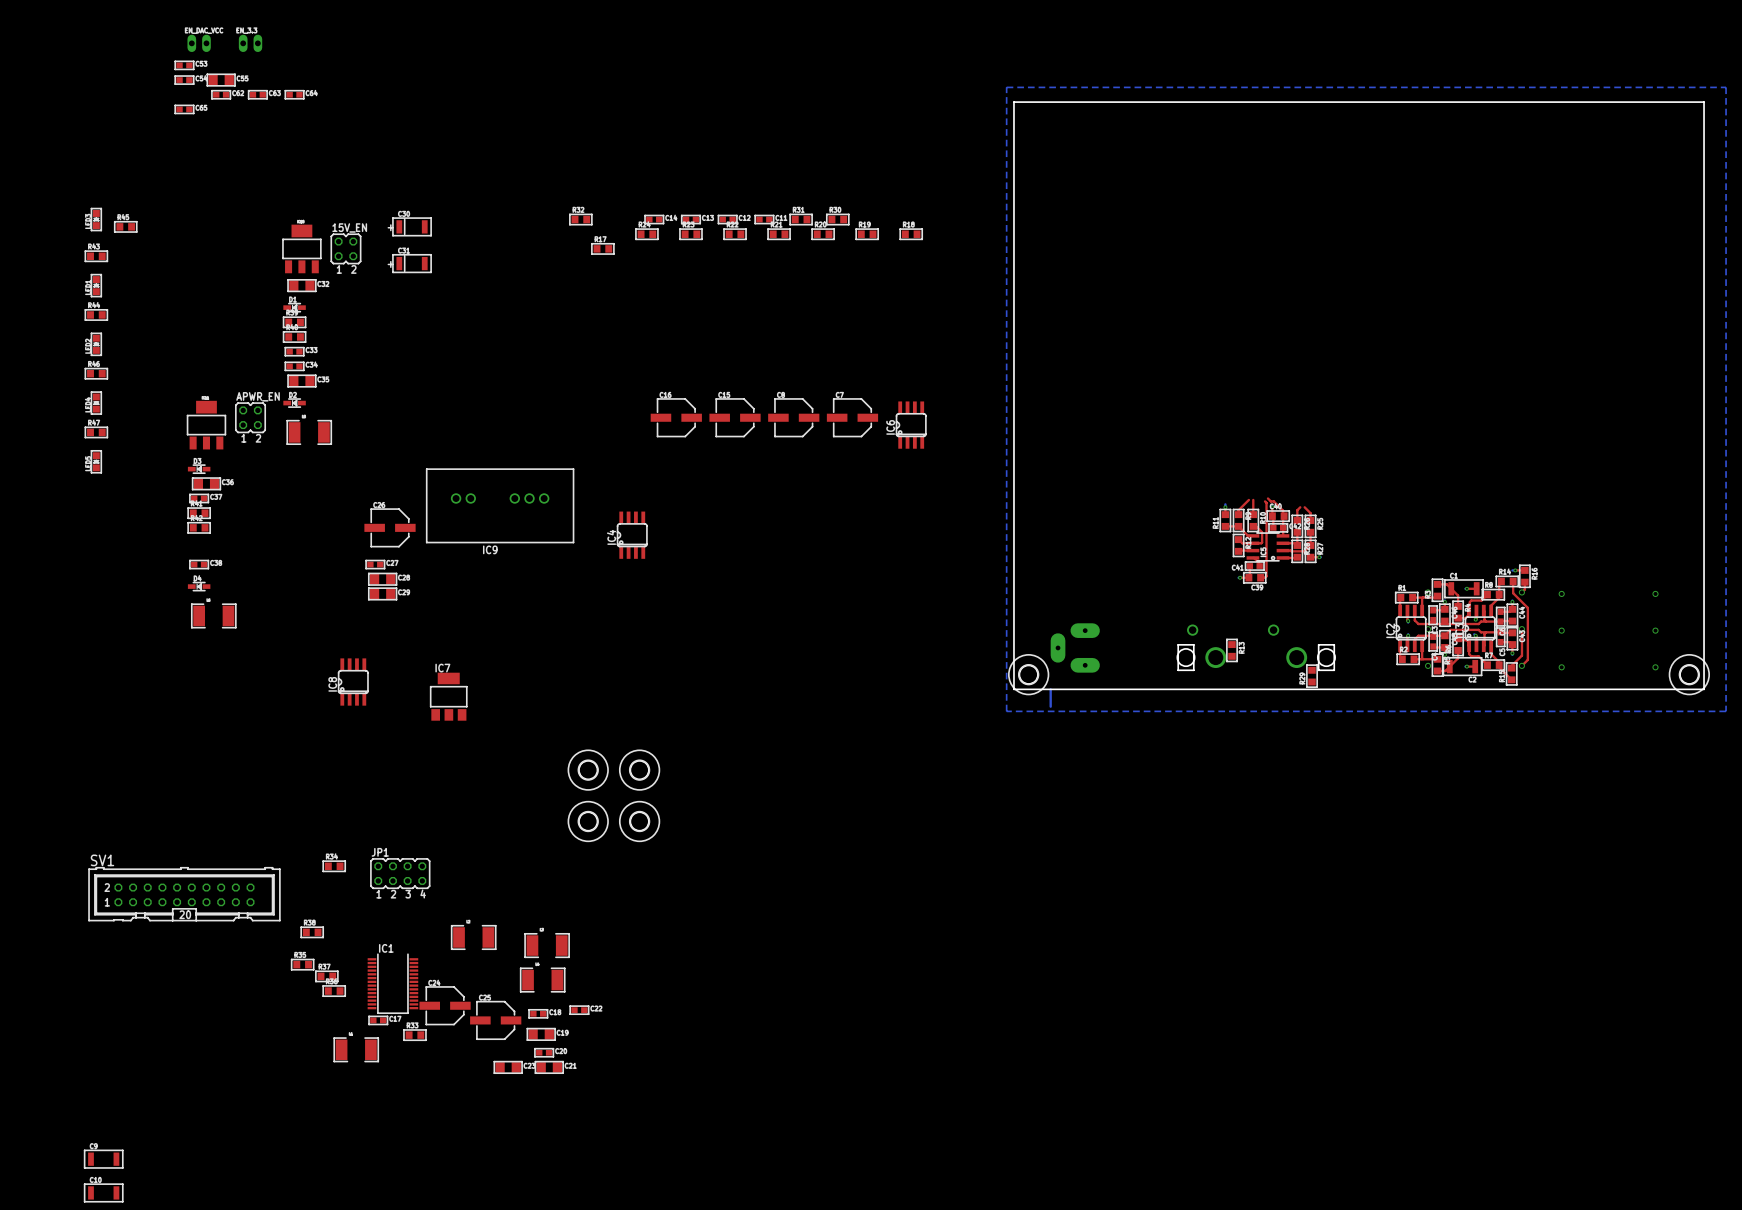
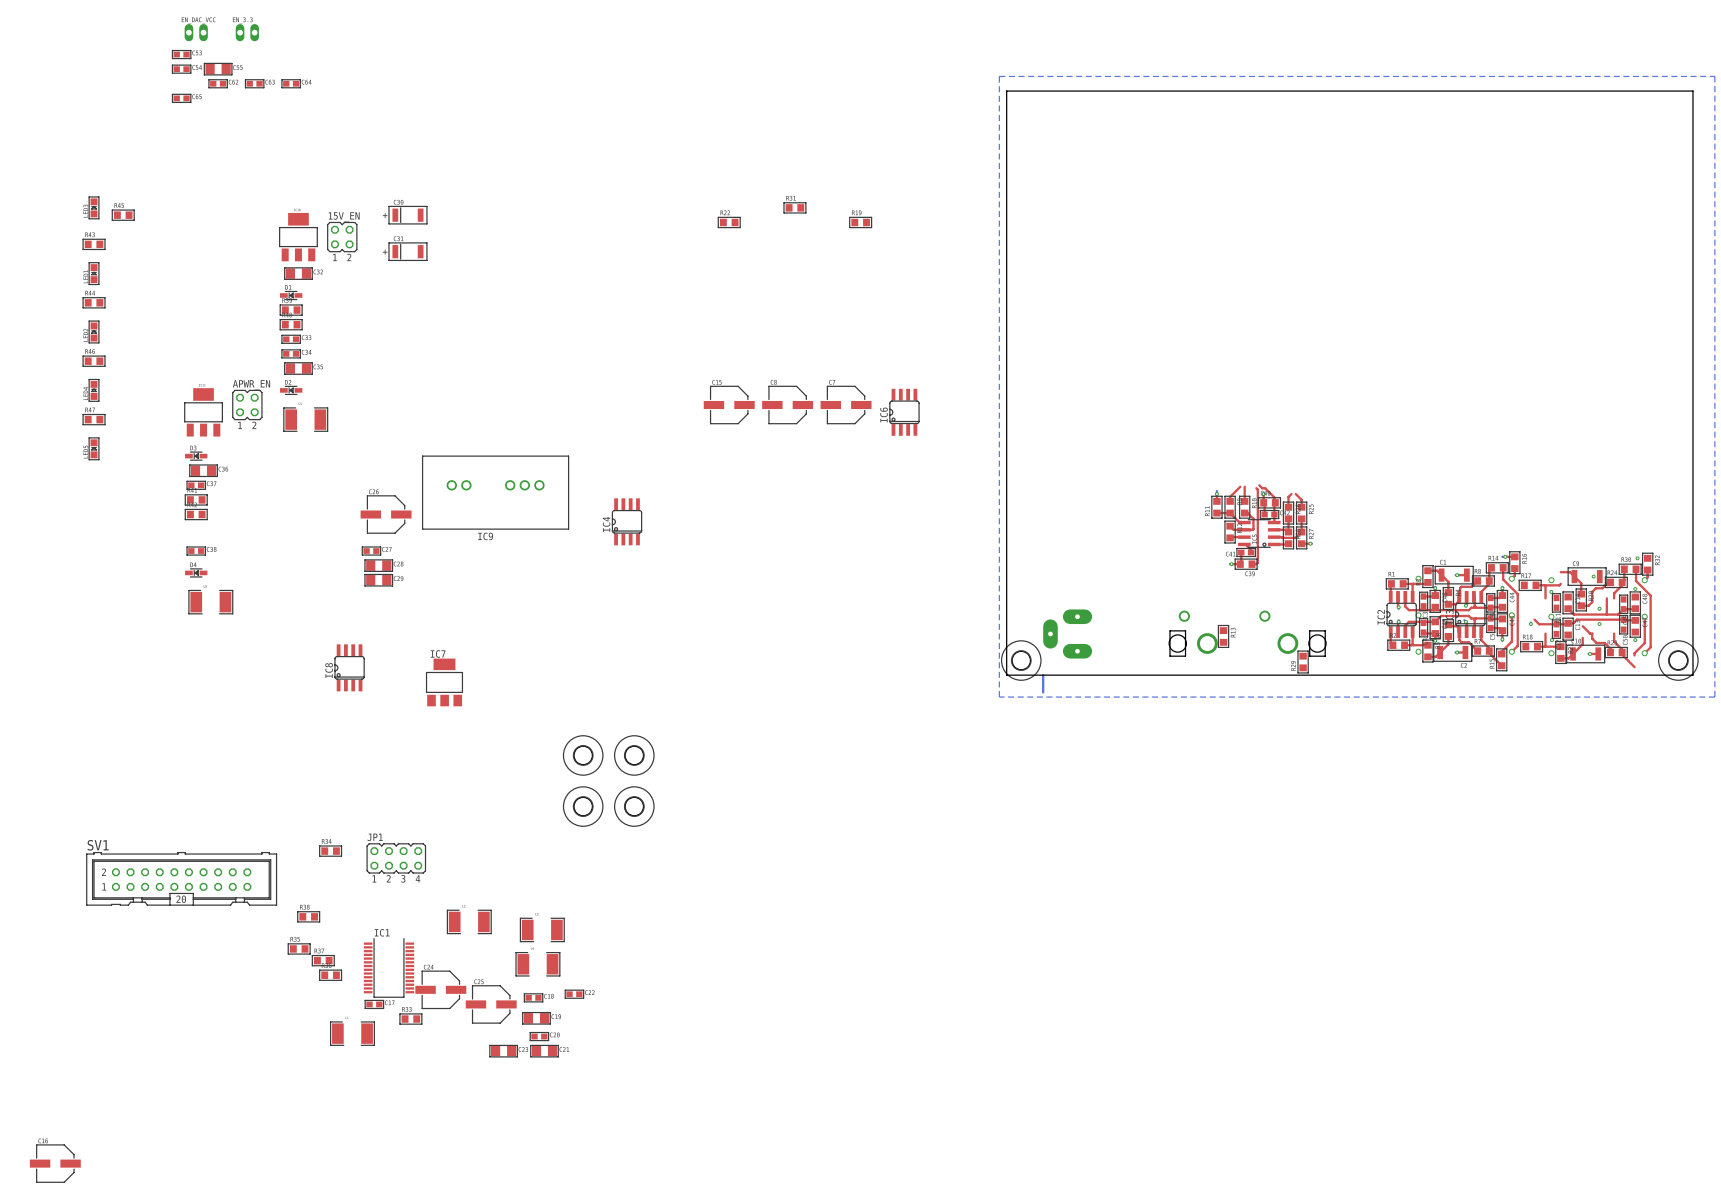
part footprint: [644, 214, 665, 225] -> [1562, 591, 1574, 615]
part footprint: [681, 214, 701, 225] -> [1562, 617, 1574, 641]
part rotation: 0° (580, 219) -> 90° clockwise (1647, 564)
part position: (580, 219) -> (1647, 564)
part rotation: 0° (727, 219) -> 90° clockwise (1556, 629)
part position: (727, 219) -> (1556, 629)
part rotation: 0° (764, 219) -> 90° clockwise (1556, 602)
part position: (764, 219) -> (1556, 602)
part position: (837, 219) -> (1630, 569)
part position: (646, 234) -> (1616, 582)
part position: (690, 234) -> (1616, 652)
part rotation: 0° (779, 234) -> 90° clockwise (1560, 652)
part position: (779, 234) -> (1560, 652)
part rotation: 0° (823, 234) -> 90° clockwise (1581, 599)
part position: (823, 234) -> (1581, 599)
part position: (911, 234) -> (1531, 646)
part position: (602, 248) -> (1530, 585)
part position: (676, 417) -> (55, 1163)
via: none -> (1637, 558)
top track: none -> (1624, 569) (1624, 580) (1614, 593) (1614, 598)
top track: none -> (1636, 569) (1636, 580) (1650, 595) (1650, 647) (1644, 653)
top track: none -> (1647, 570) (1647, 577) (1644, 580)
top track: none -> (1560, 572) (1570, 572) (1581, 583) (1581, 594)
via: none -> (1593, 576)
top track: none -> (1610, 582) (1602, 588) (1595, 588) (1592, 591) (1592, 602) (1588, 605) (1581, 605)
top track: none -> (1560, 583) (1536, 585)
top track: none -> (1544, 585) (1545, 598)
via: none -> (1635, 588)
via: none -> (1551, 591)
top track: none -> (1606, 598) (1606, 614)
part: none -> (1635, 602)
part: none -> (1623, 604)
top track: none -> (1568, 608) (1573, 614) (1618, 614) (1623, 609) (1635, 608)
via: none -> (1599, 608)
top track: none -> (1644, 616) (1644, 643) (1634, 655)
top track: none -> (1534, 619) (1539, 624) (1567, 624) (1573, 623) (1576, 619) (1635, 620)
via: none -> (1530, 624)
via: none -> (1599, 624)
part: none -> (1623, 624)
top track: none -> (1582, 626) (1592, 633) (1592, 638) (1596, 643) (1604, 643) (1611, 649) (1610, 652)
part: none -> (1635, 626)
top track: none -> (1545, 633) (1545, 646)
top track: none -> (1614, 633) (1614, 641) (1622, 649) (1622, 654) (1634, 667)
top track: none -> (1582, 637) (1582, 644) (1568, 658) (1560, 658)
via: none -> (1552, 640)
via: none -> (1635, 640)
top track: none -> (1537, 646) (1560, 646)
top track: none -> (1590, 653) (1598, 653)
via: none -> (1590, 653)
part position: (103, 1159) -> (1587, 576)
part position: (103, 1192) -> (1585, 653)

